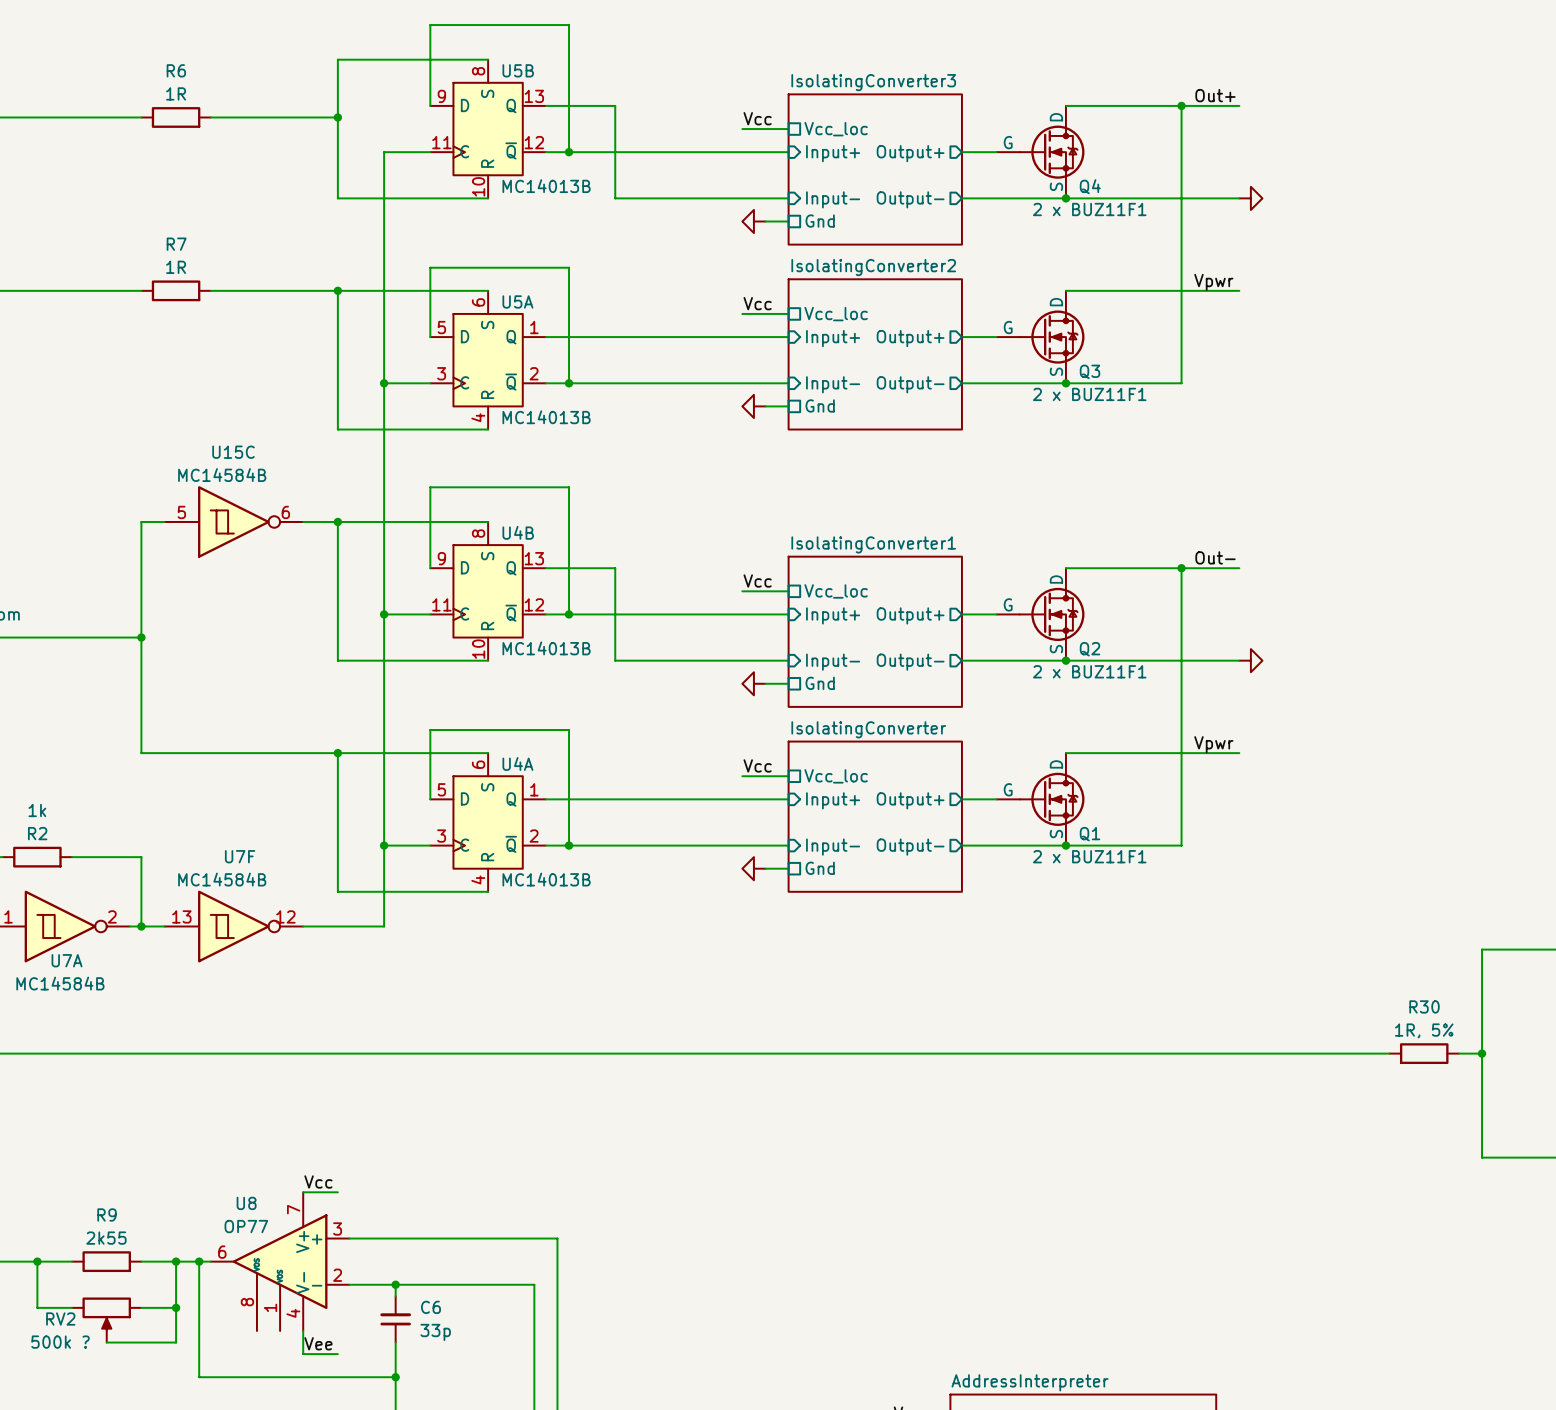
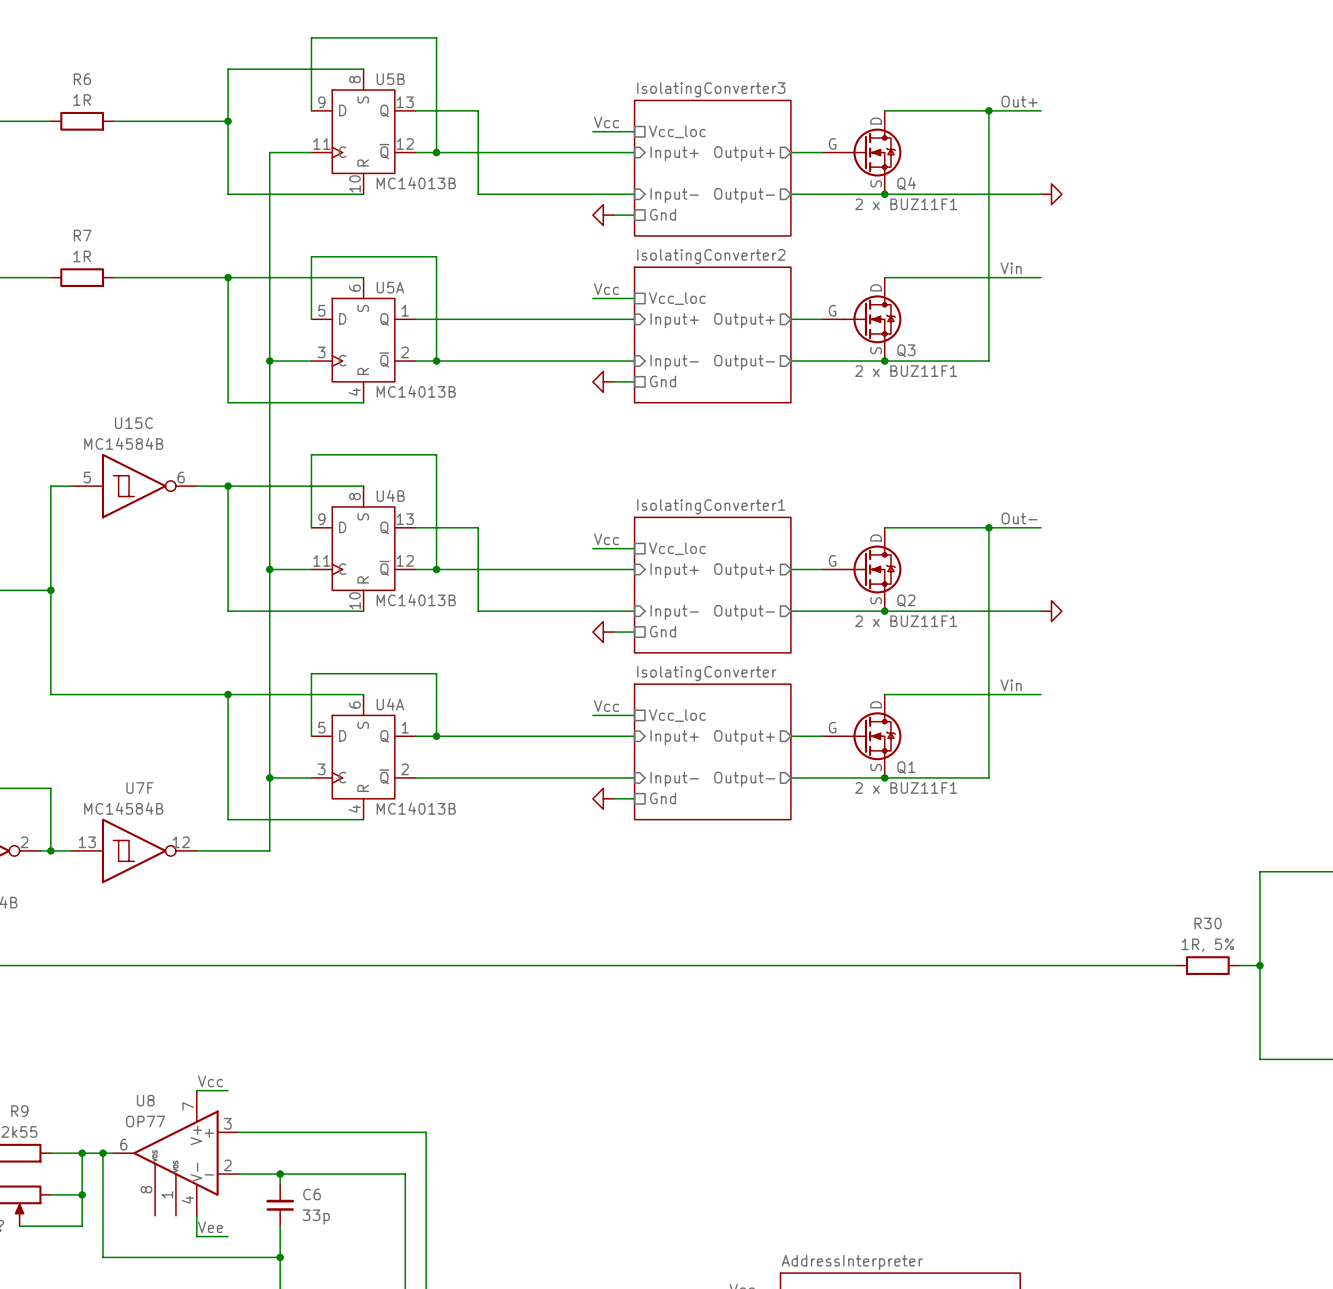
label: Vpwr (1213, 282) -> Vin (1011, 268)
label: Vpwr (1213, 744) -> Vin (1011, 685)
wire: (569, 799) (569, 845) -> none
junction position: (569, 845) -> (436, 736)

